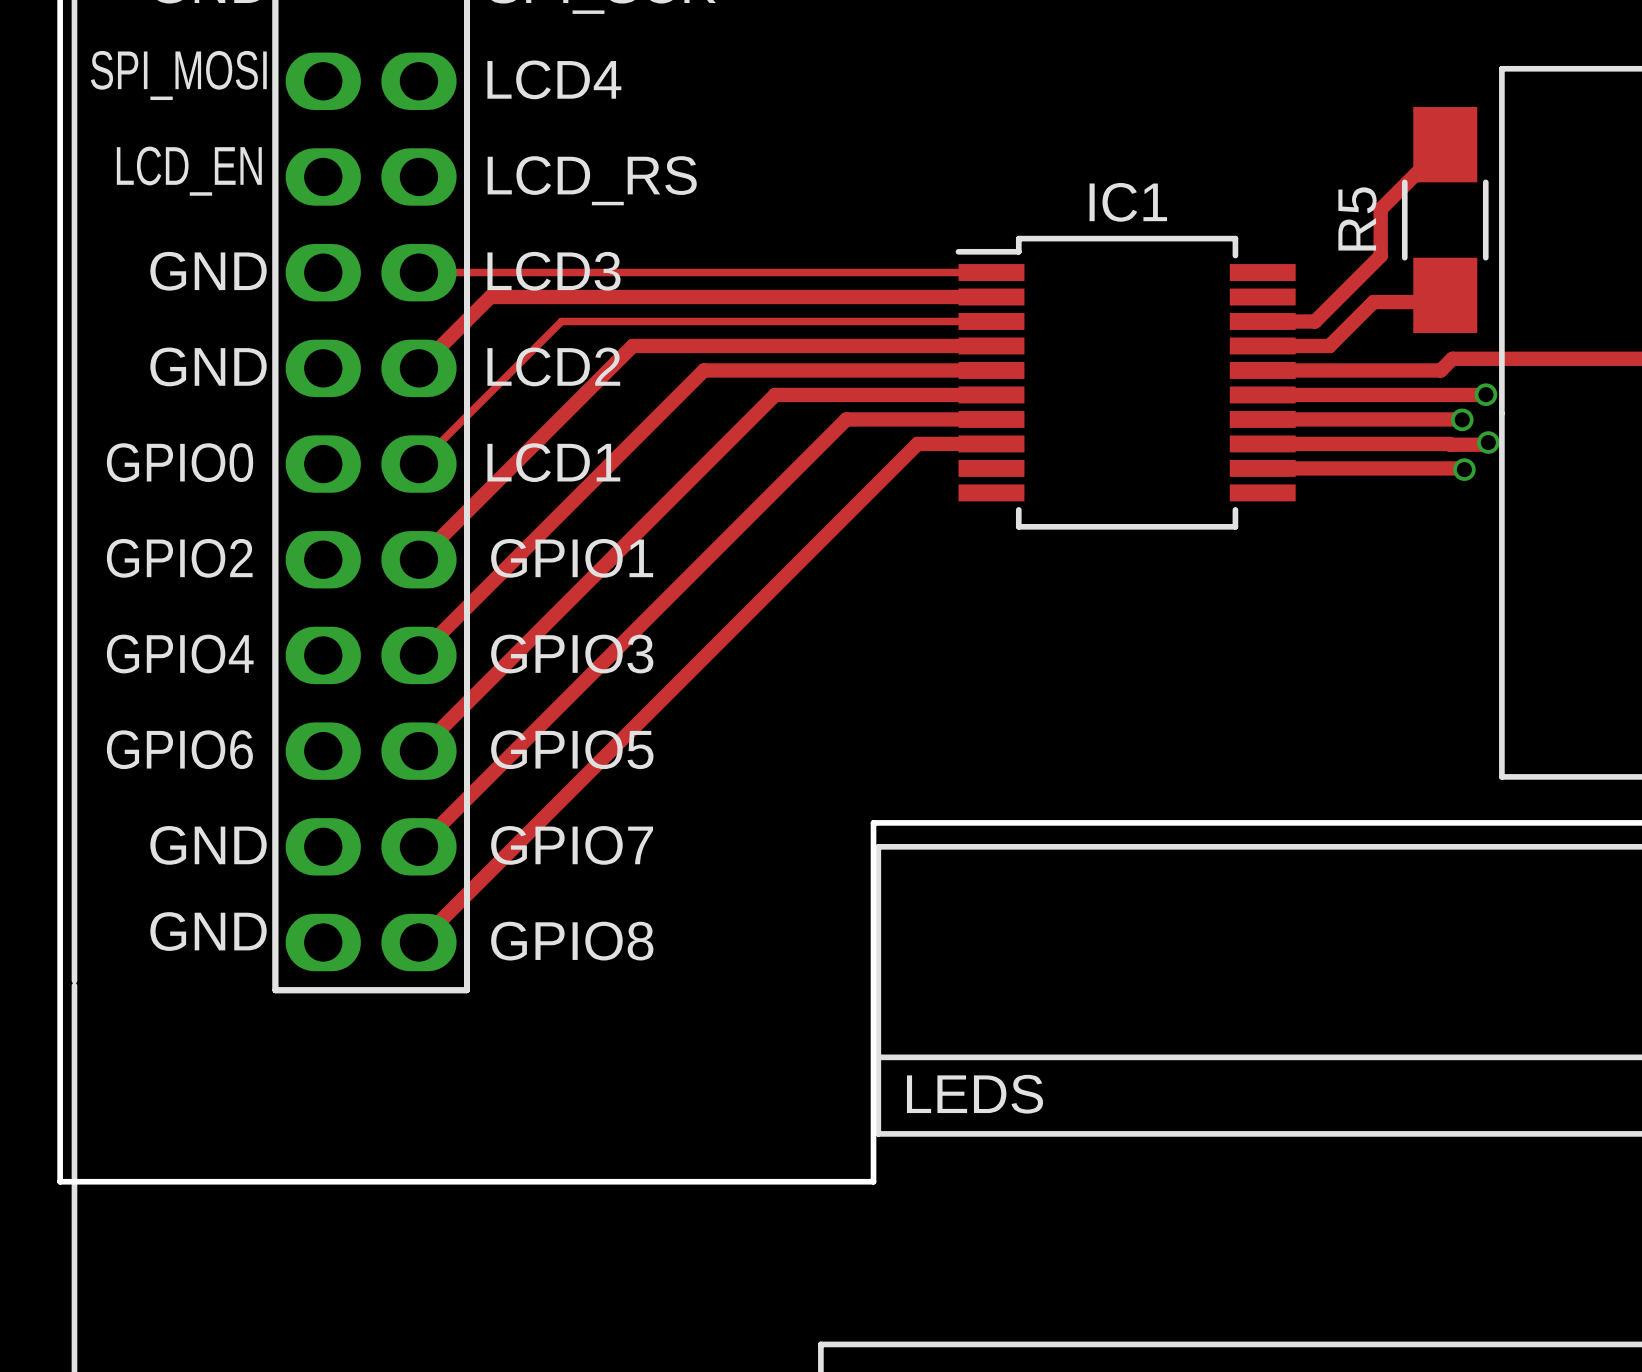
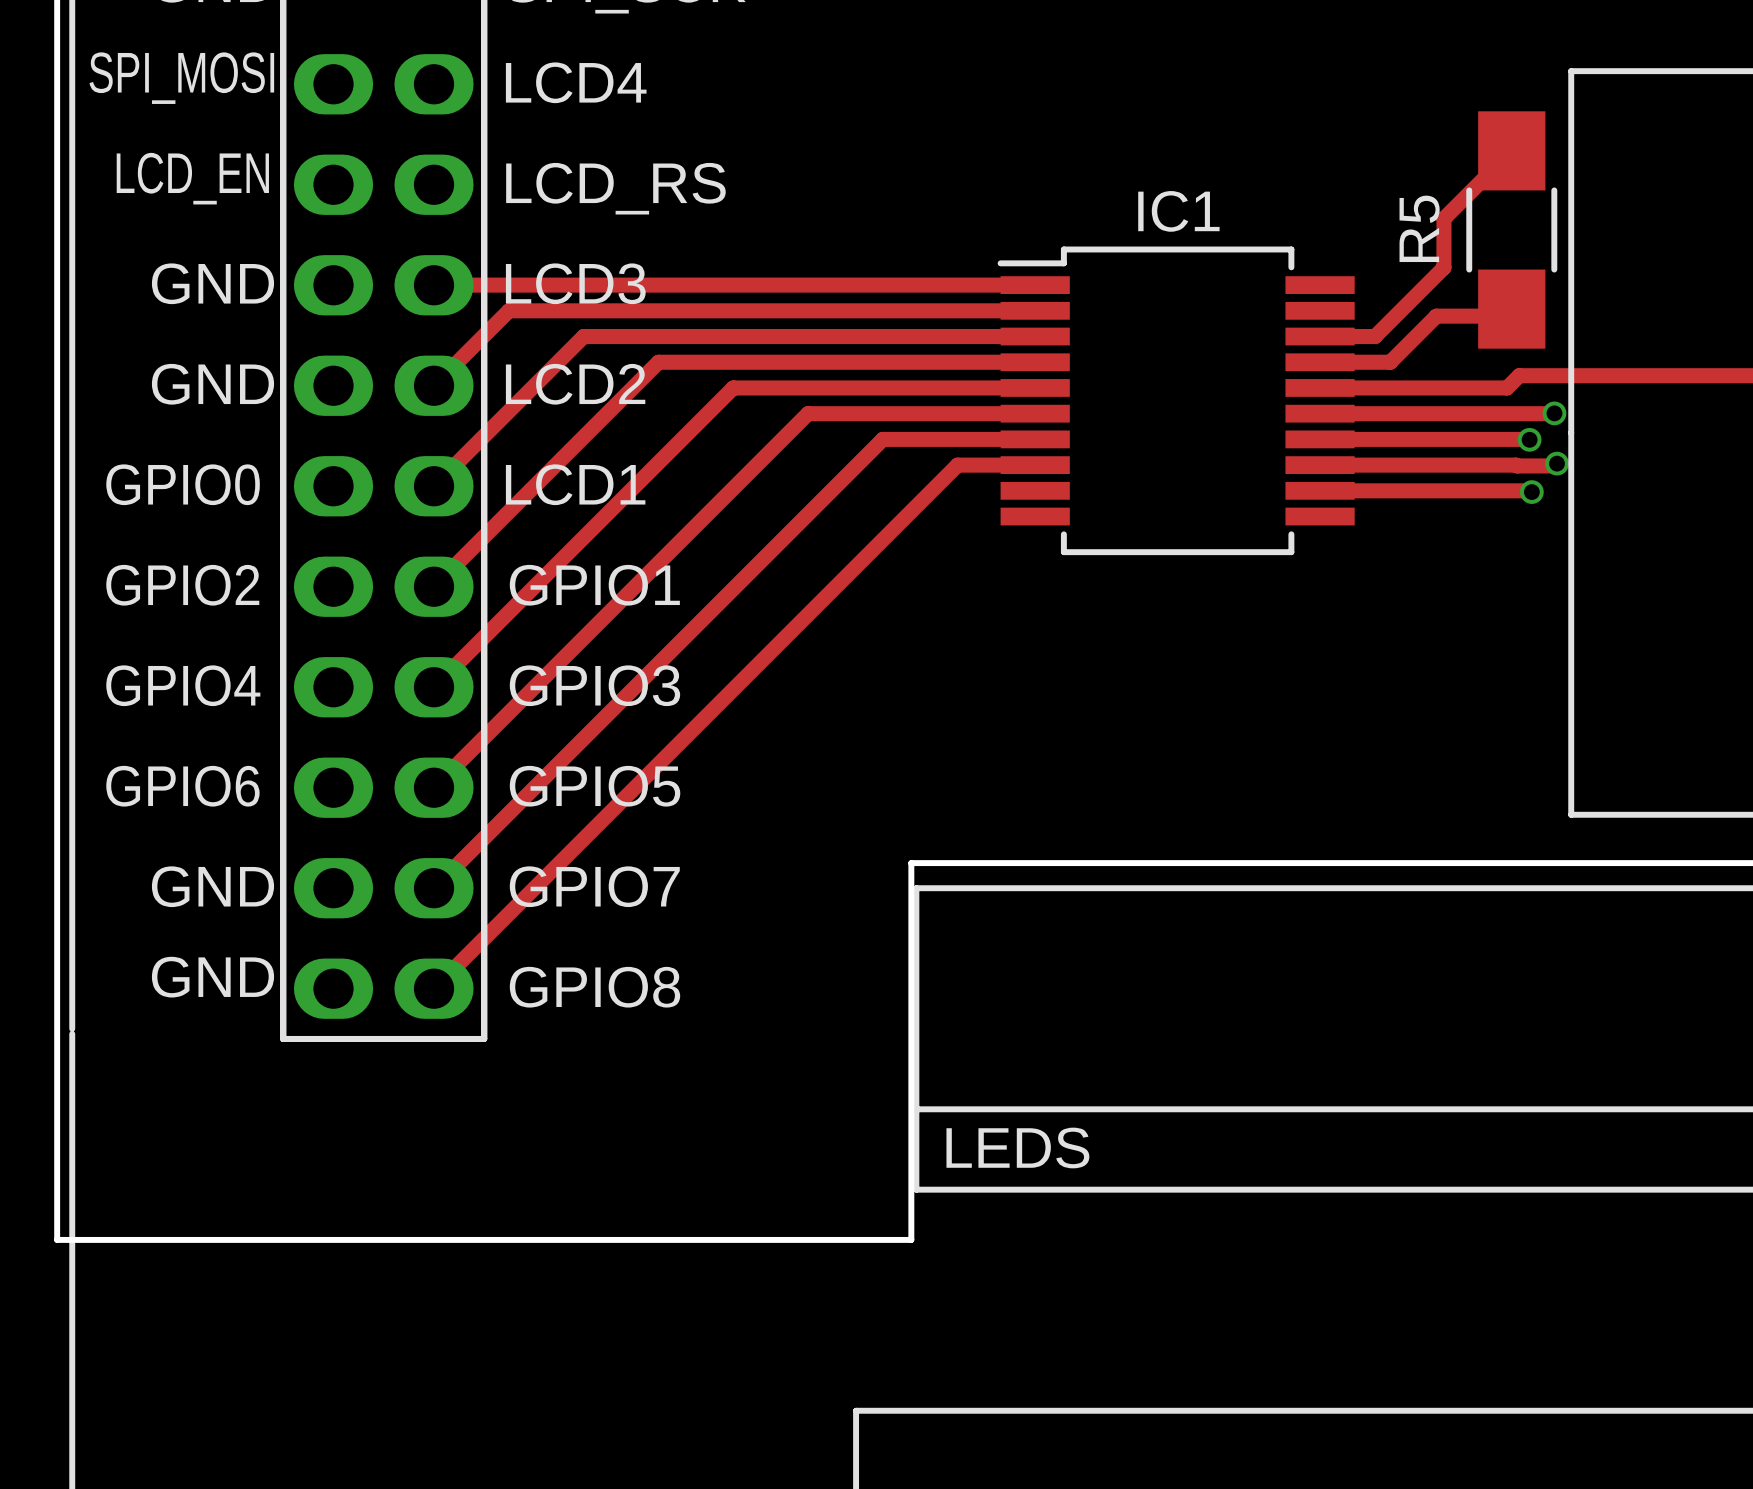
track width: thin (419, 272) (991, 272) -> thick (434, 285) (1035, 285)
track width: thin (991, 321) (561, 321) (418, 464) -> thick (1035, 336) (583, 336) (434, 486)

